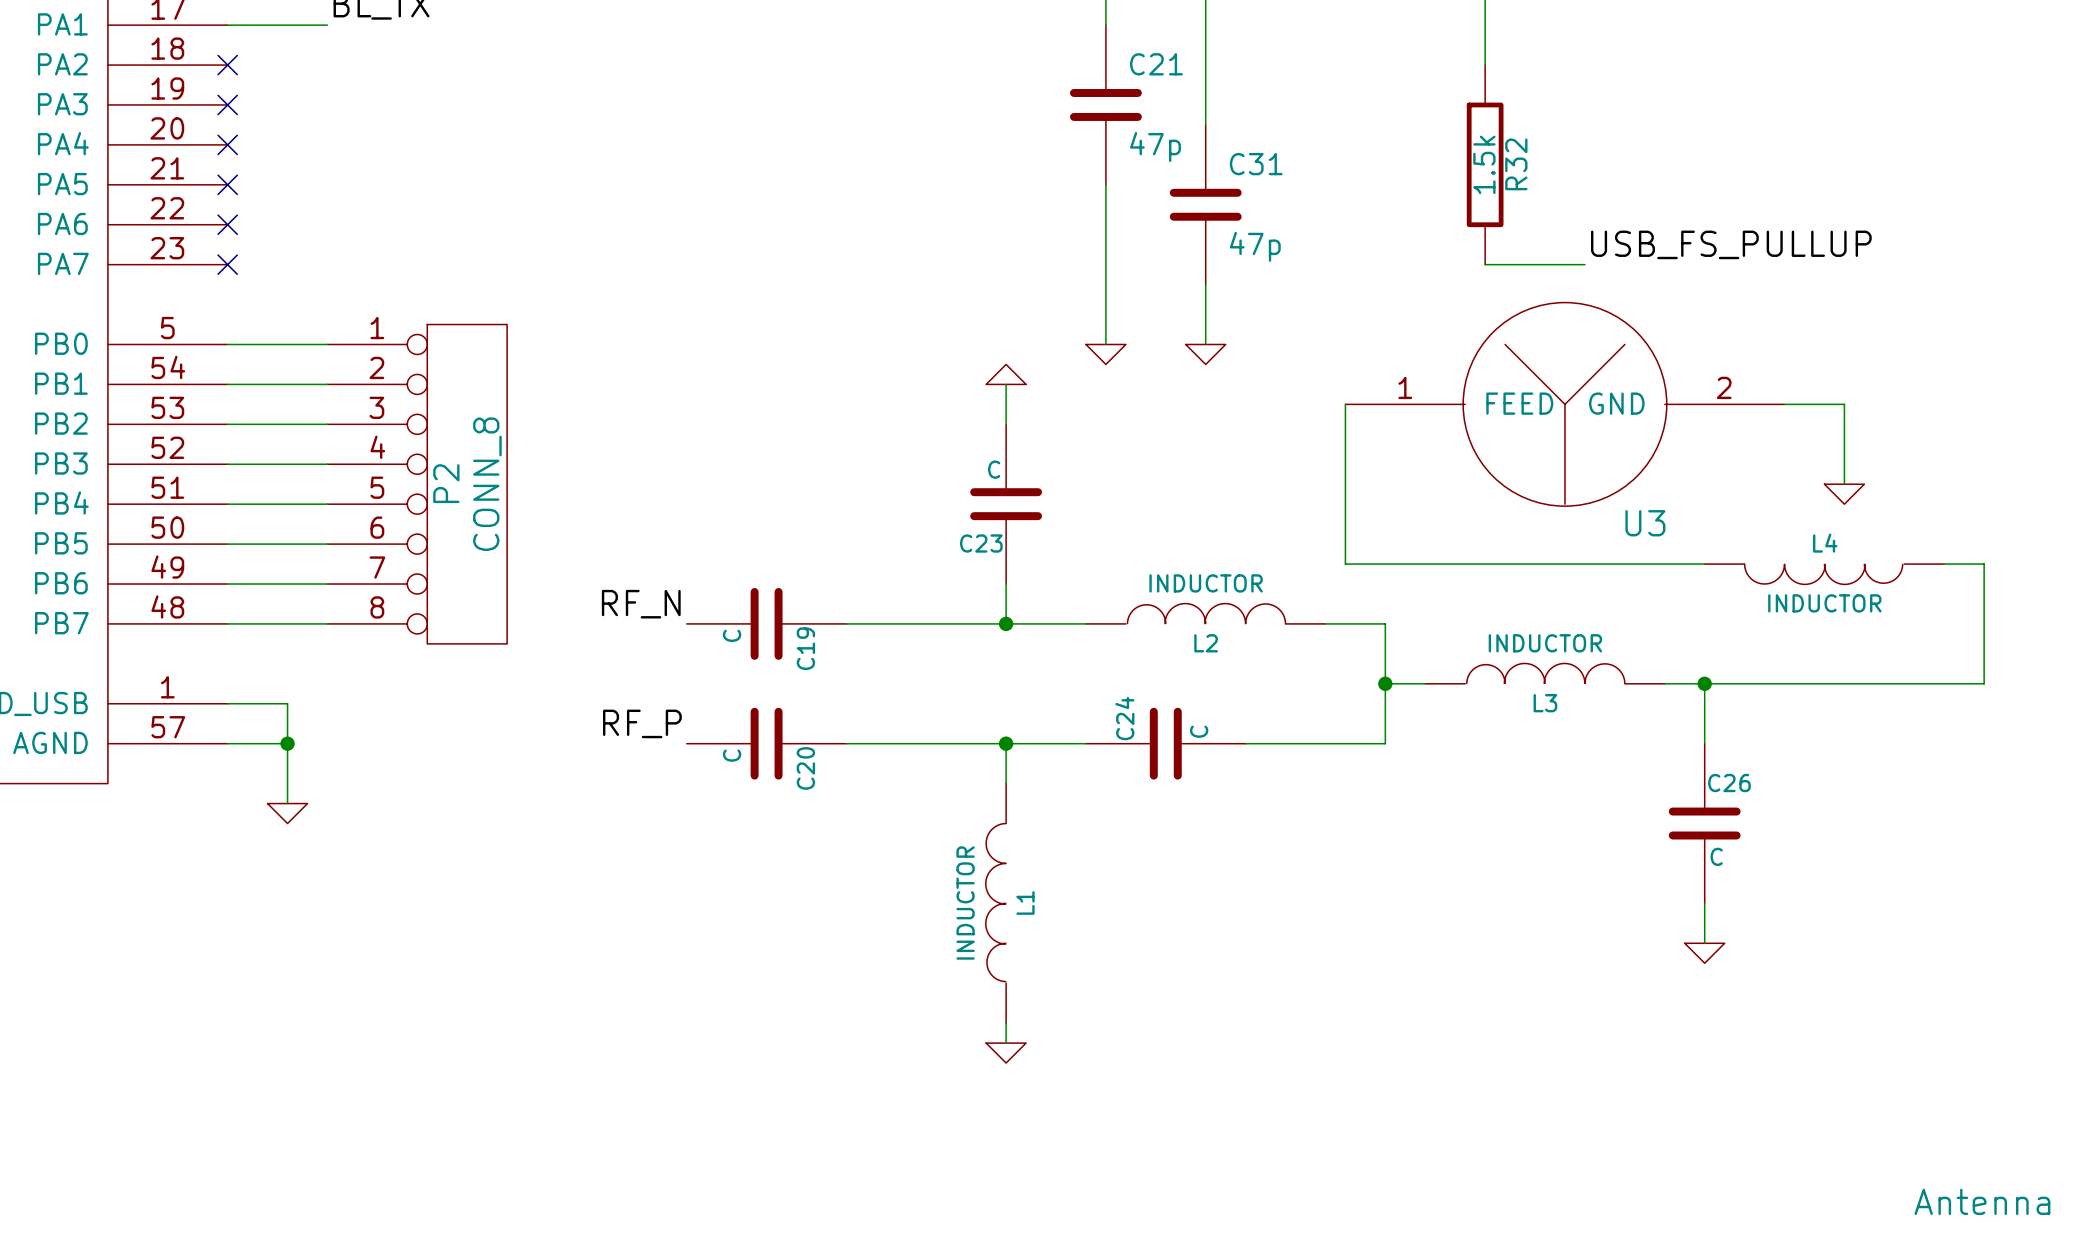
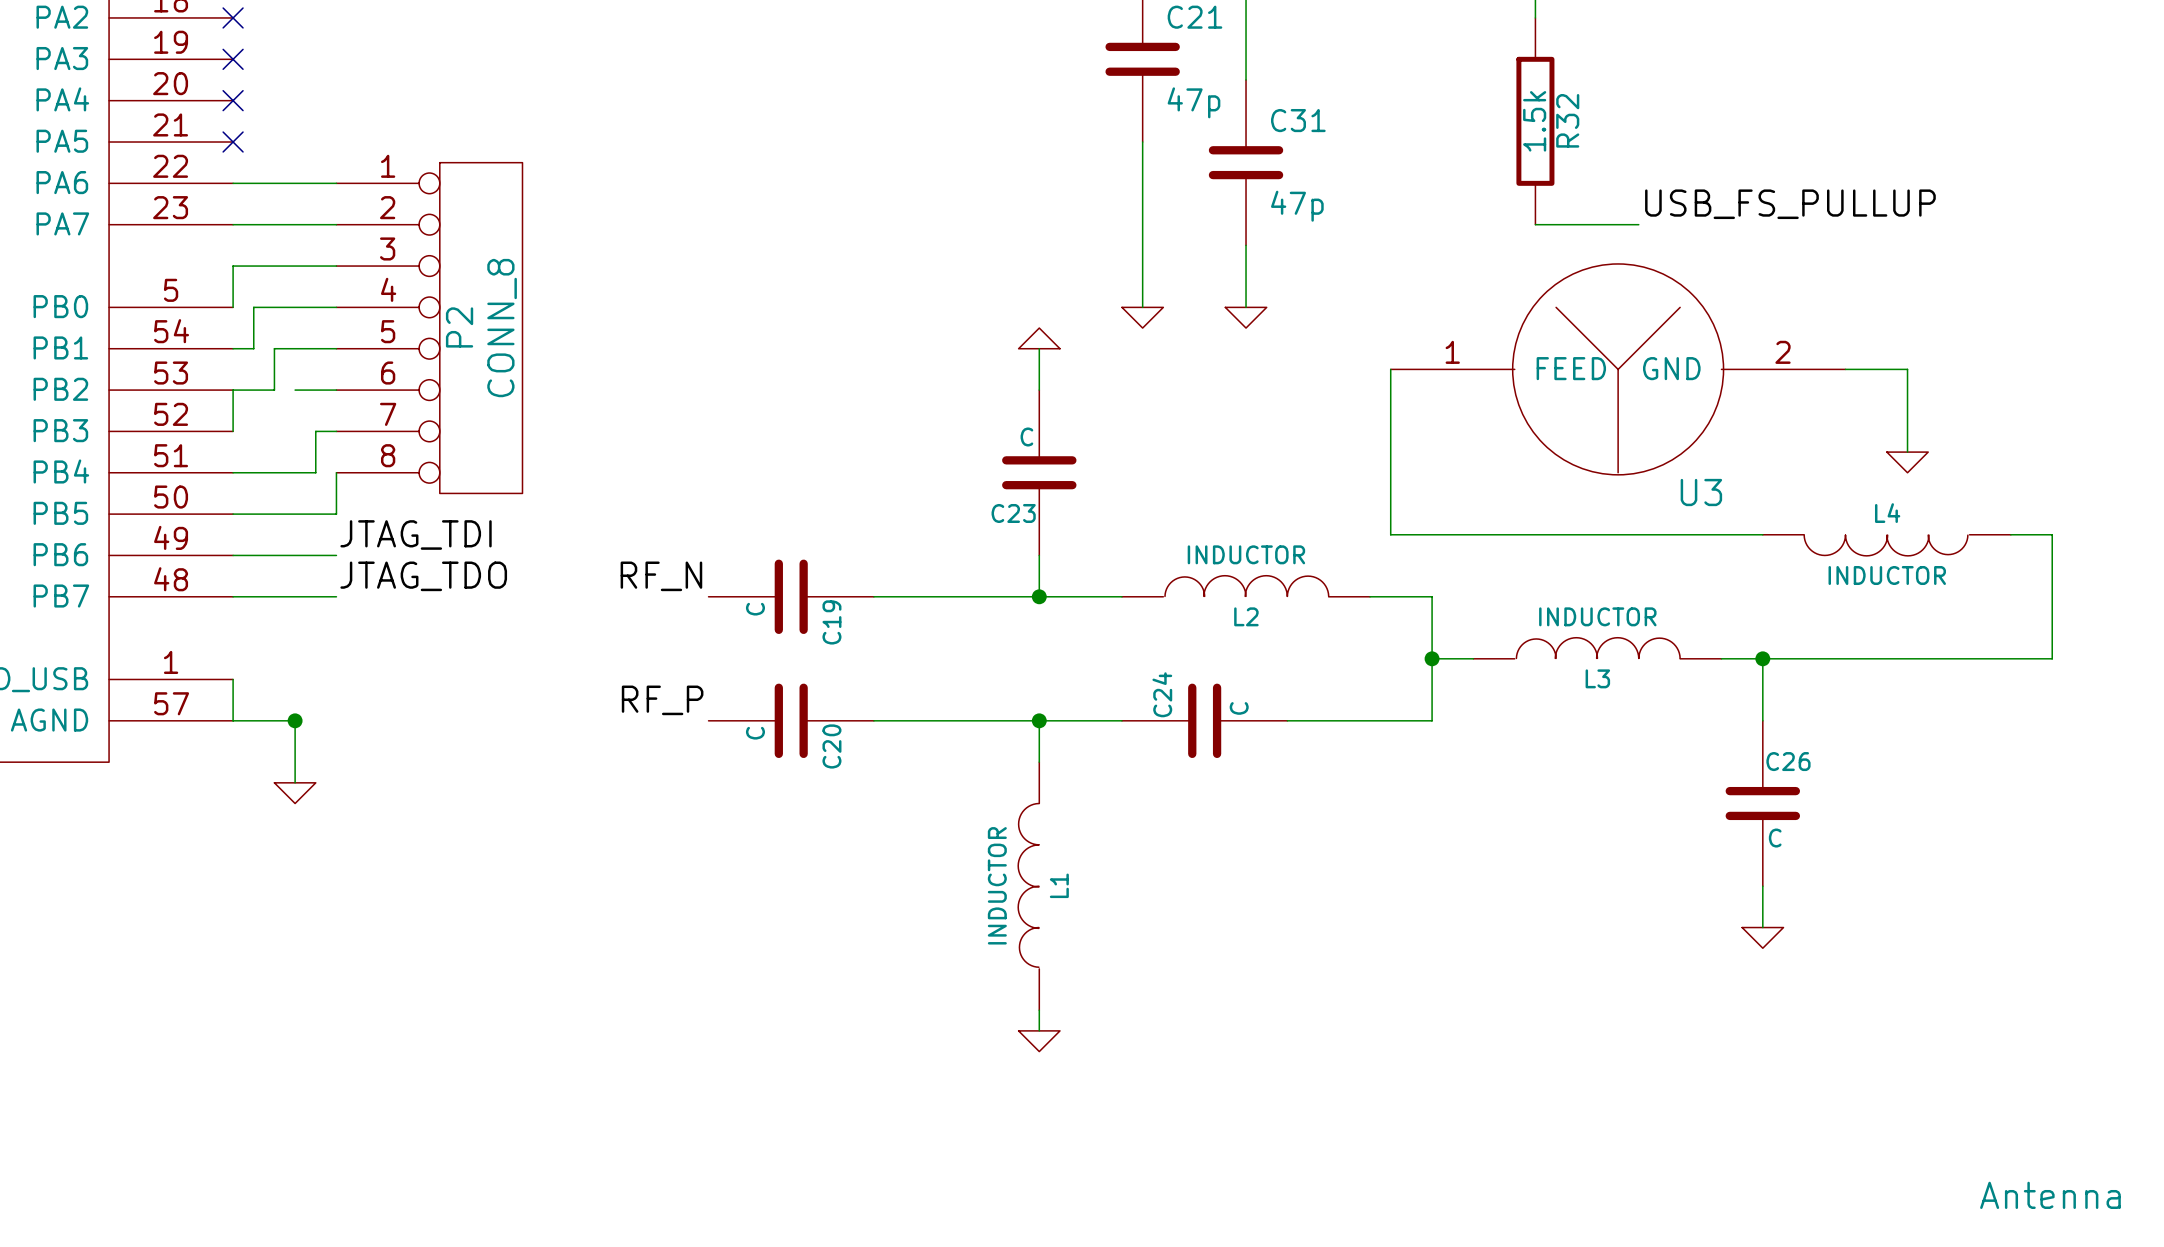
wire: none -> (233, 183) (336, 183)
no-connect mark: (227, 224) -> none
wire: none -> (233, 224) (336, 224)
no-connect mark: (227, 264) -> none
wire: none -> (336, 266) (233, 266) (233, 307)
wire: (227, 344) (247, 344) -> (253, 348) (253, 307)
wire: (247, 384) (267, 384) -> (274, 390) (274, 348)
wire: (267, 424) (287, 424) -> none
wire: (227, 464) (307, 464) -> (233, 431) (233, 390)
P2 position: (417, 484) -> (429, 328)
wire: (307, 504) (327, 504) -> (315, 472) (315, 431)
wire: none -> (336, 472) (336, 514)
label: none -> JTAG_TDI (416, 534)
label: none -> JTAG_TDO (423, 576)
wire: (227, 703) (287, 703) (287, 743) -> (233, 679) (233, 720)

